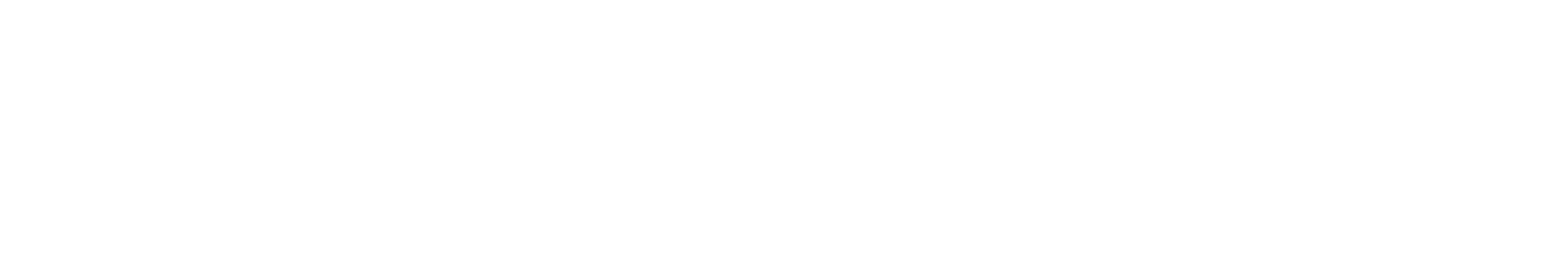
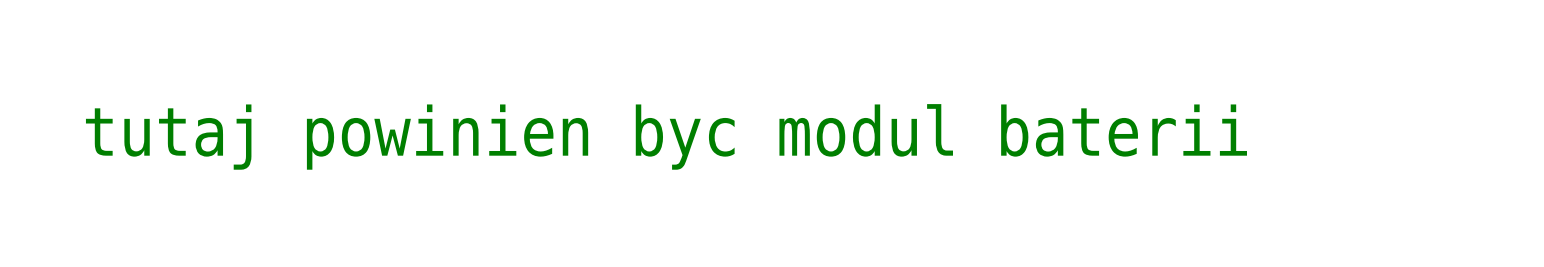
text: none -> tutaj powinien byc modul baterii (666, 136)

